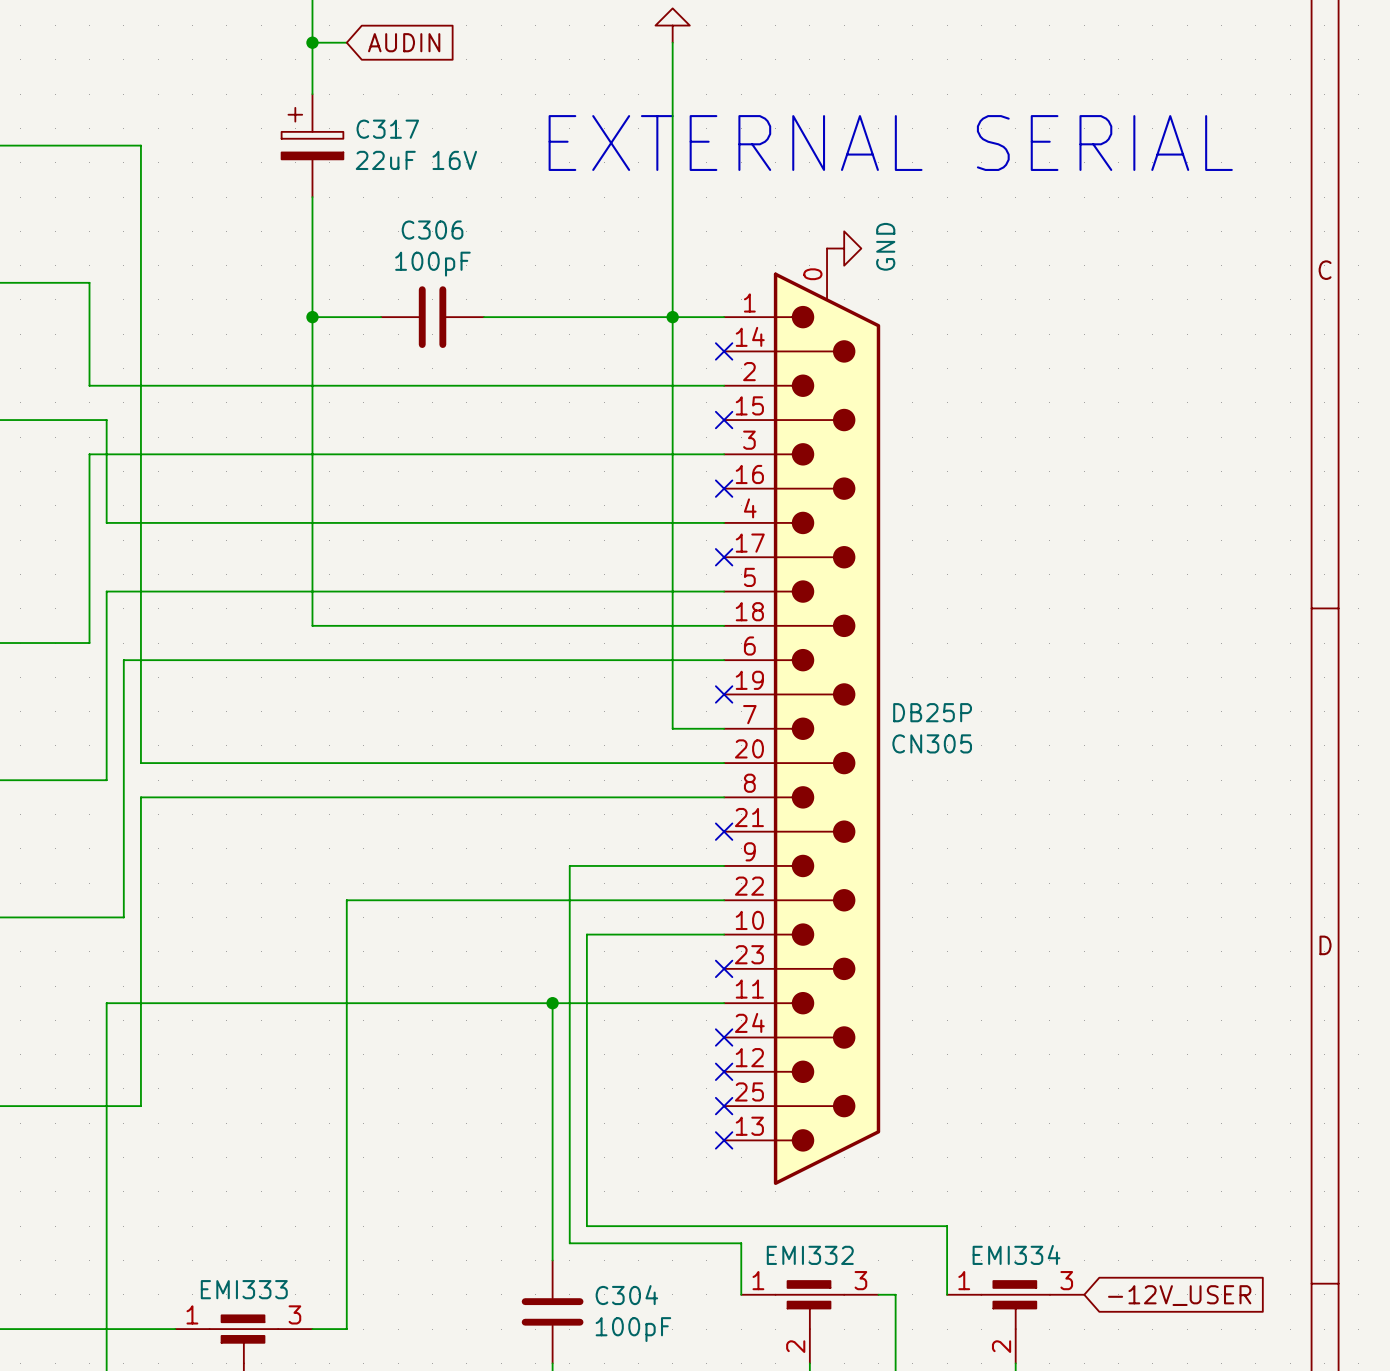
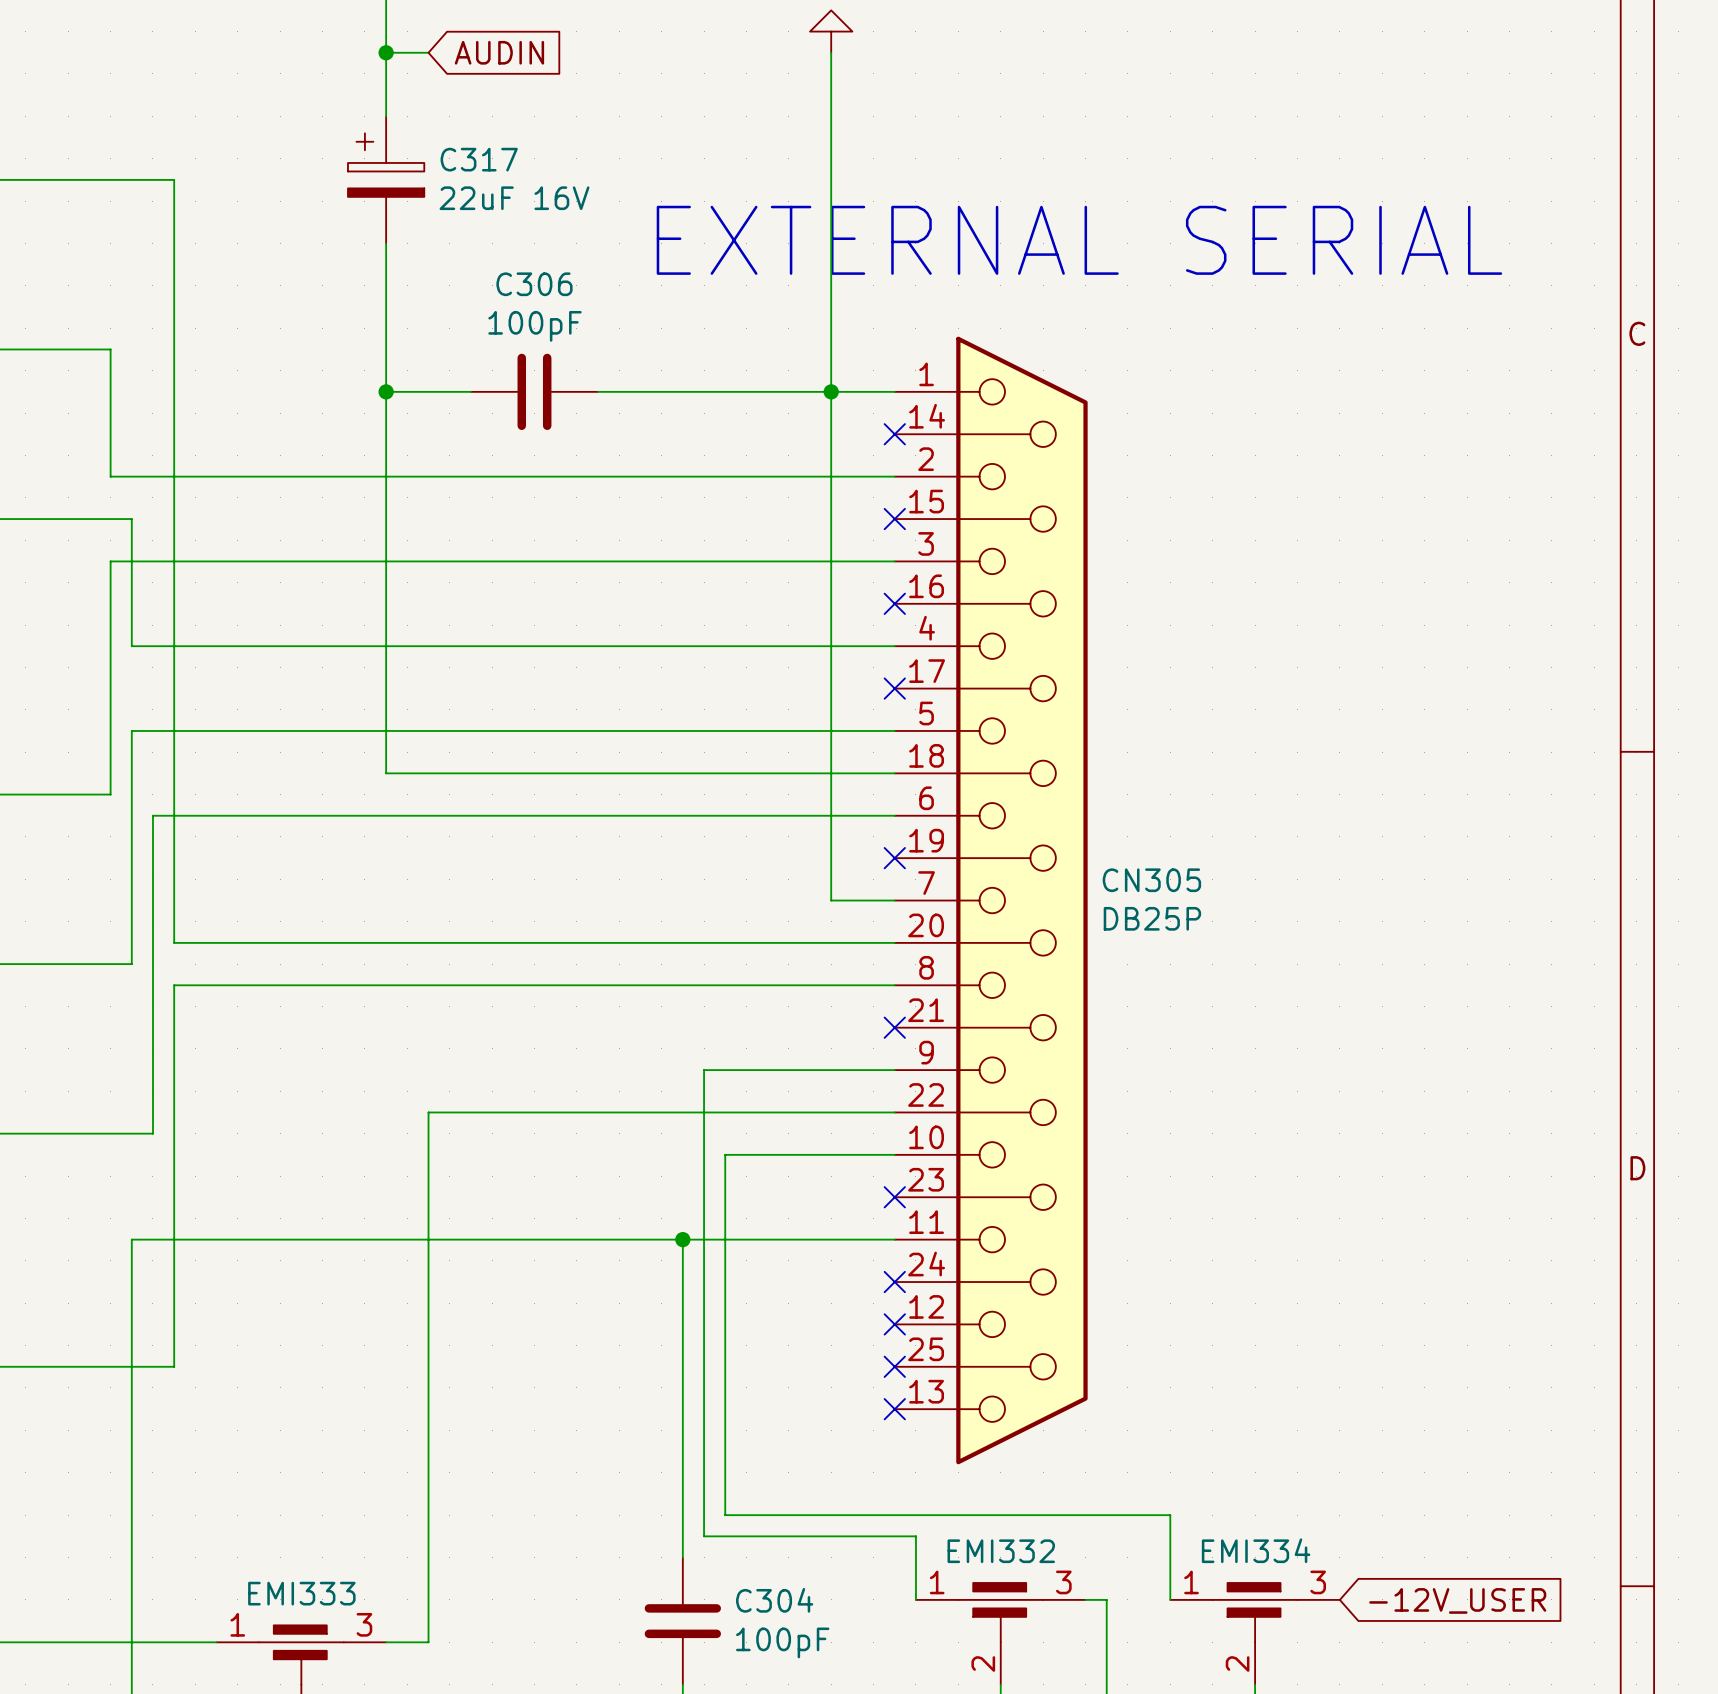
text position: EXTERNAL SERIAL (890, 143) -> EXTERNAL SERIAL (1079, 240)
CN305 symbol: [724, 248, 881, 1185] -> [894, 336, 1088, 1465]
power symbol: GND (844, 248) -> none
CN305 name position: CN305 (932, 743) -> CN305 (1151, 880)

